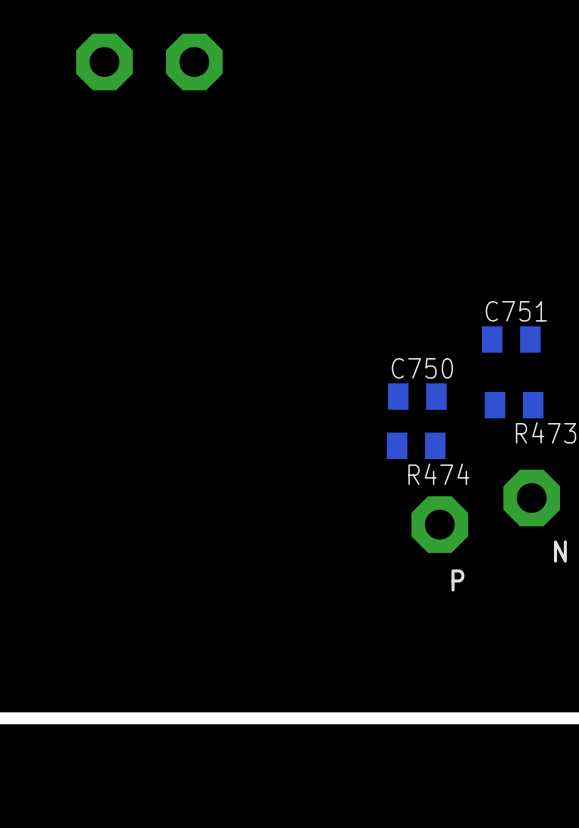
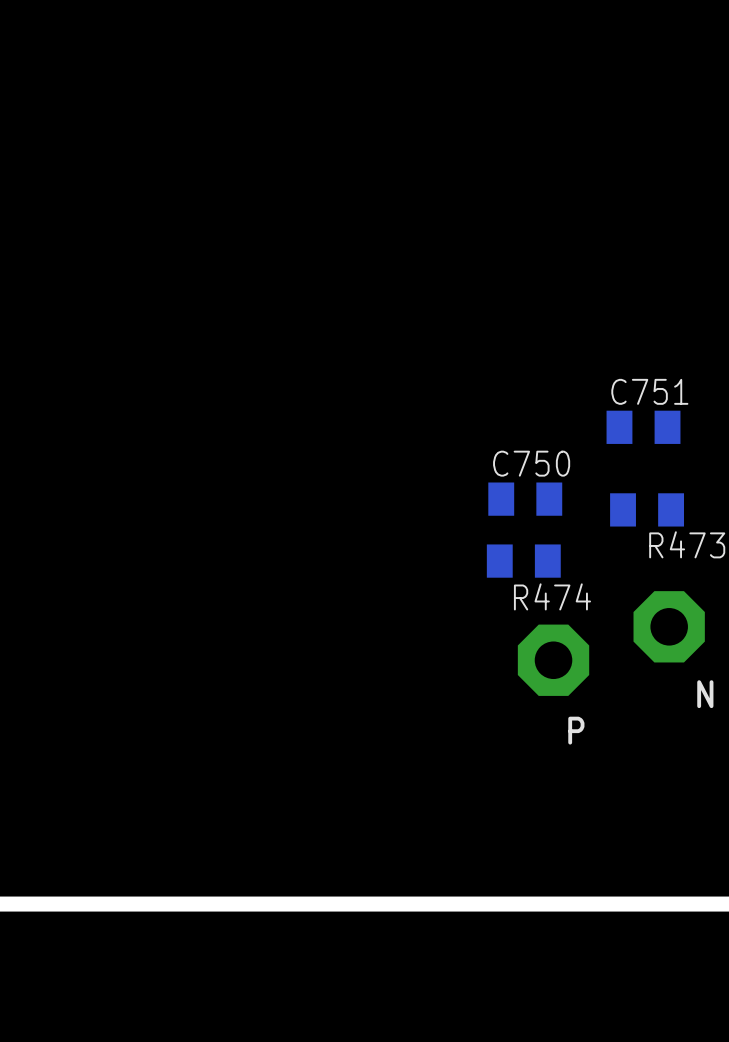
part: (104, 61) -> none
part: (194, 61) -> none

